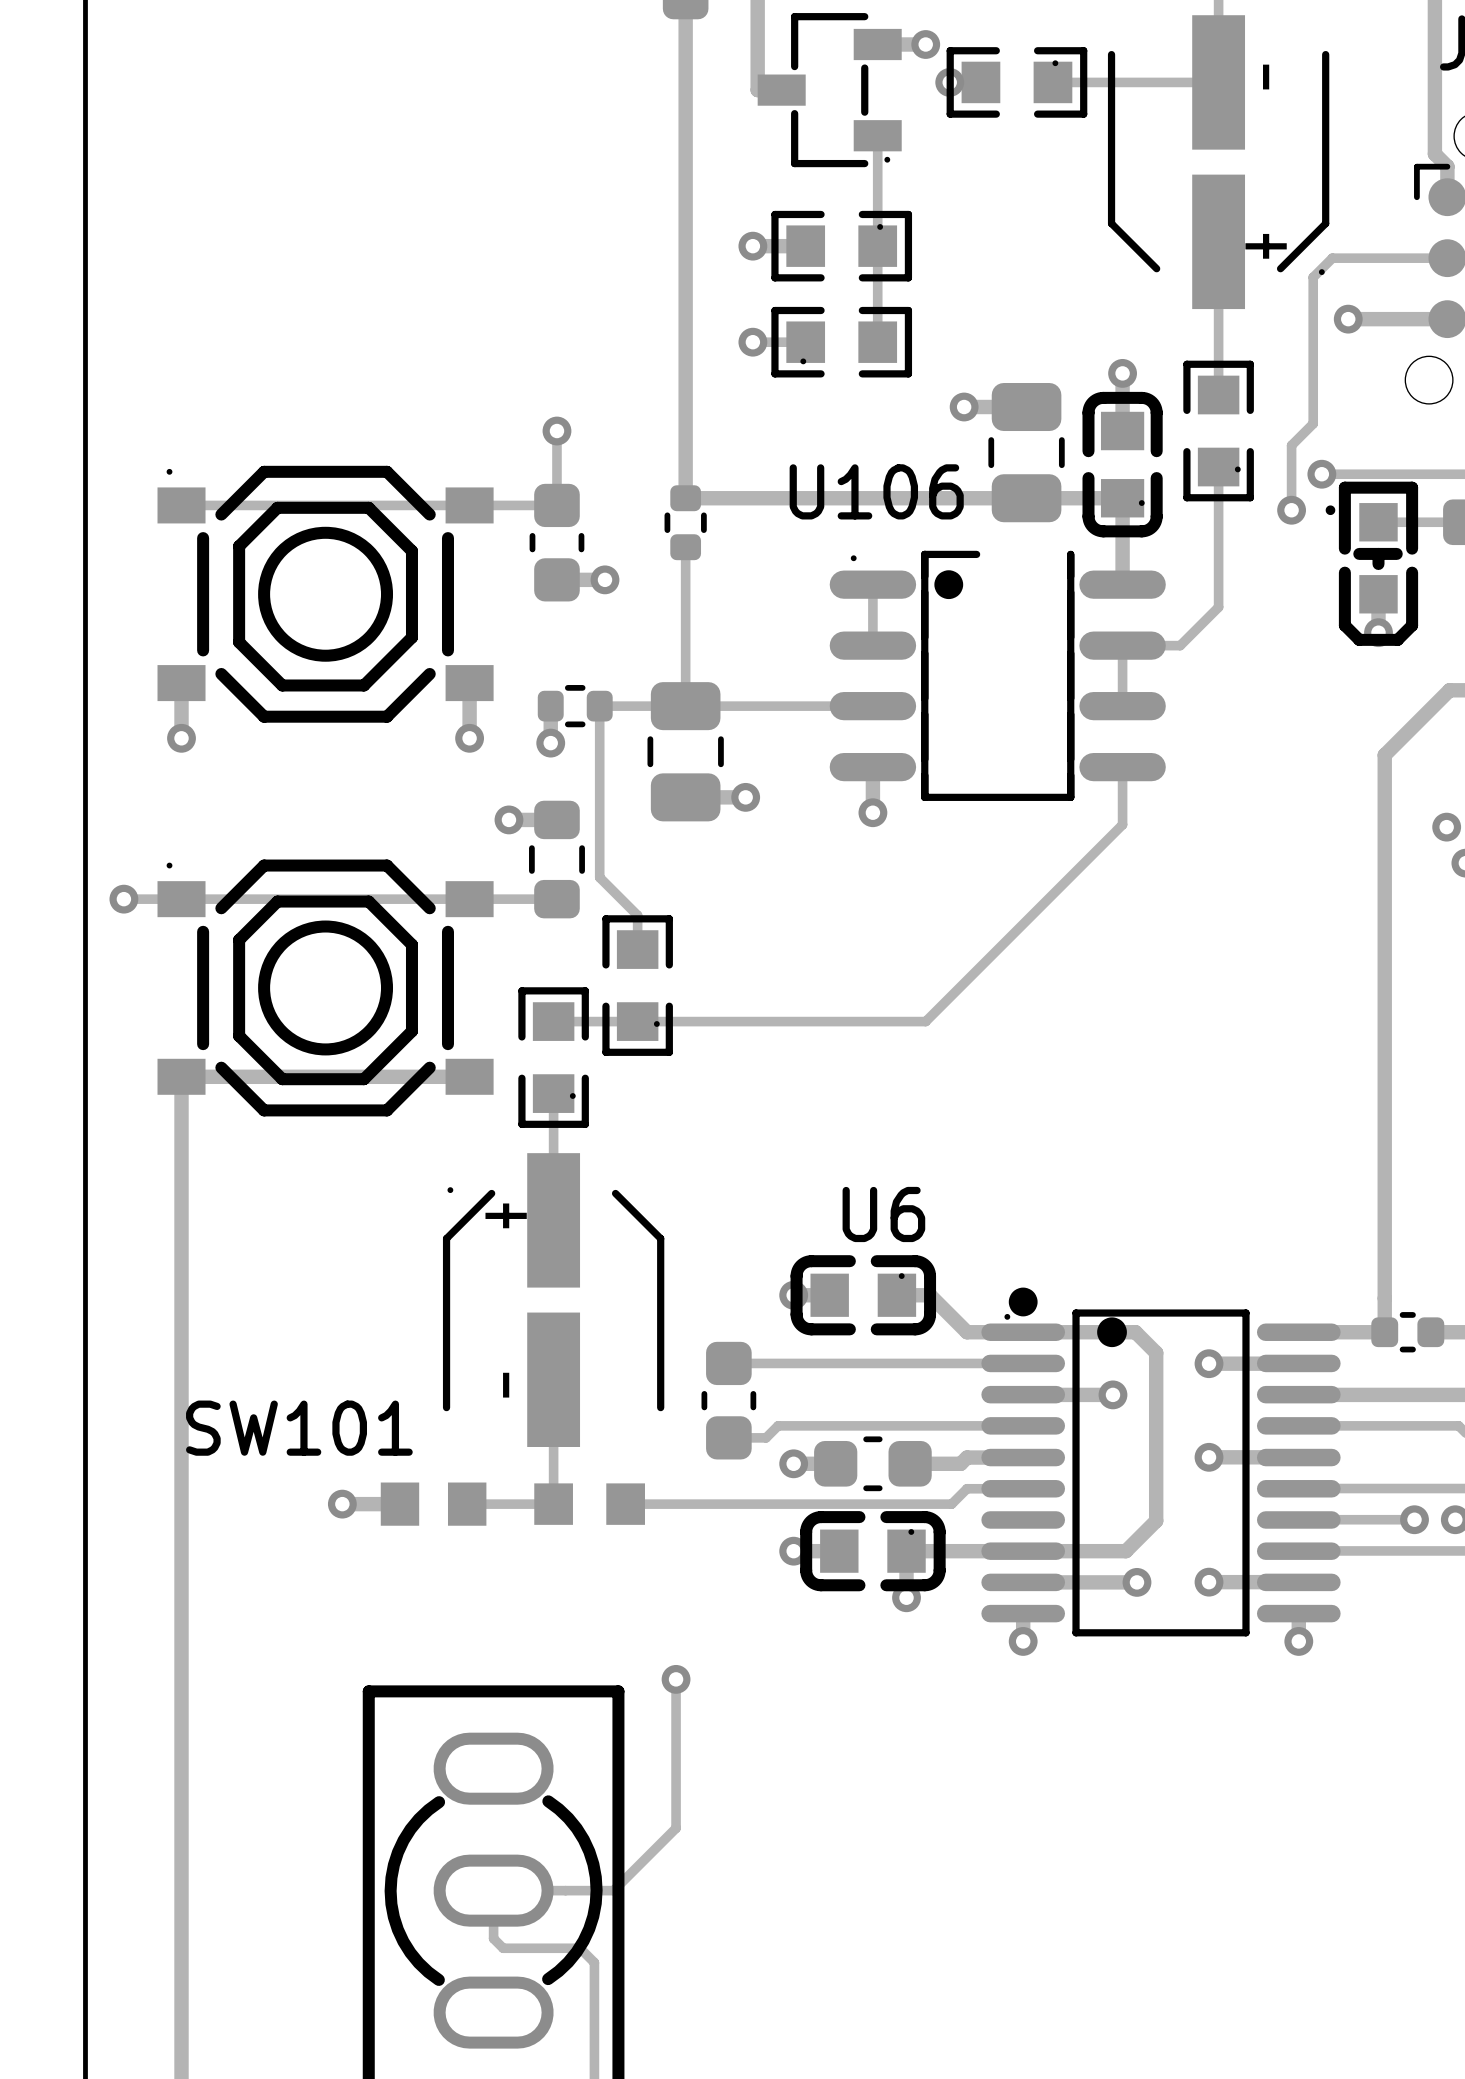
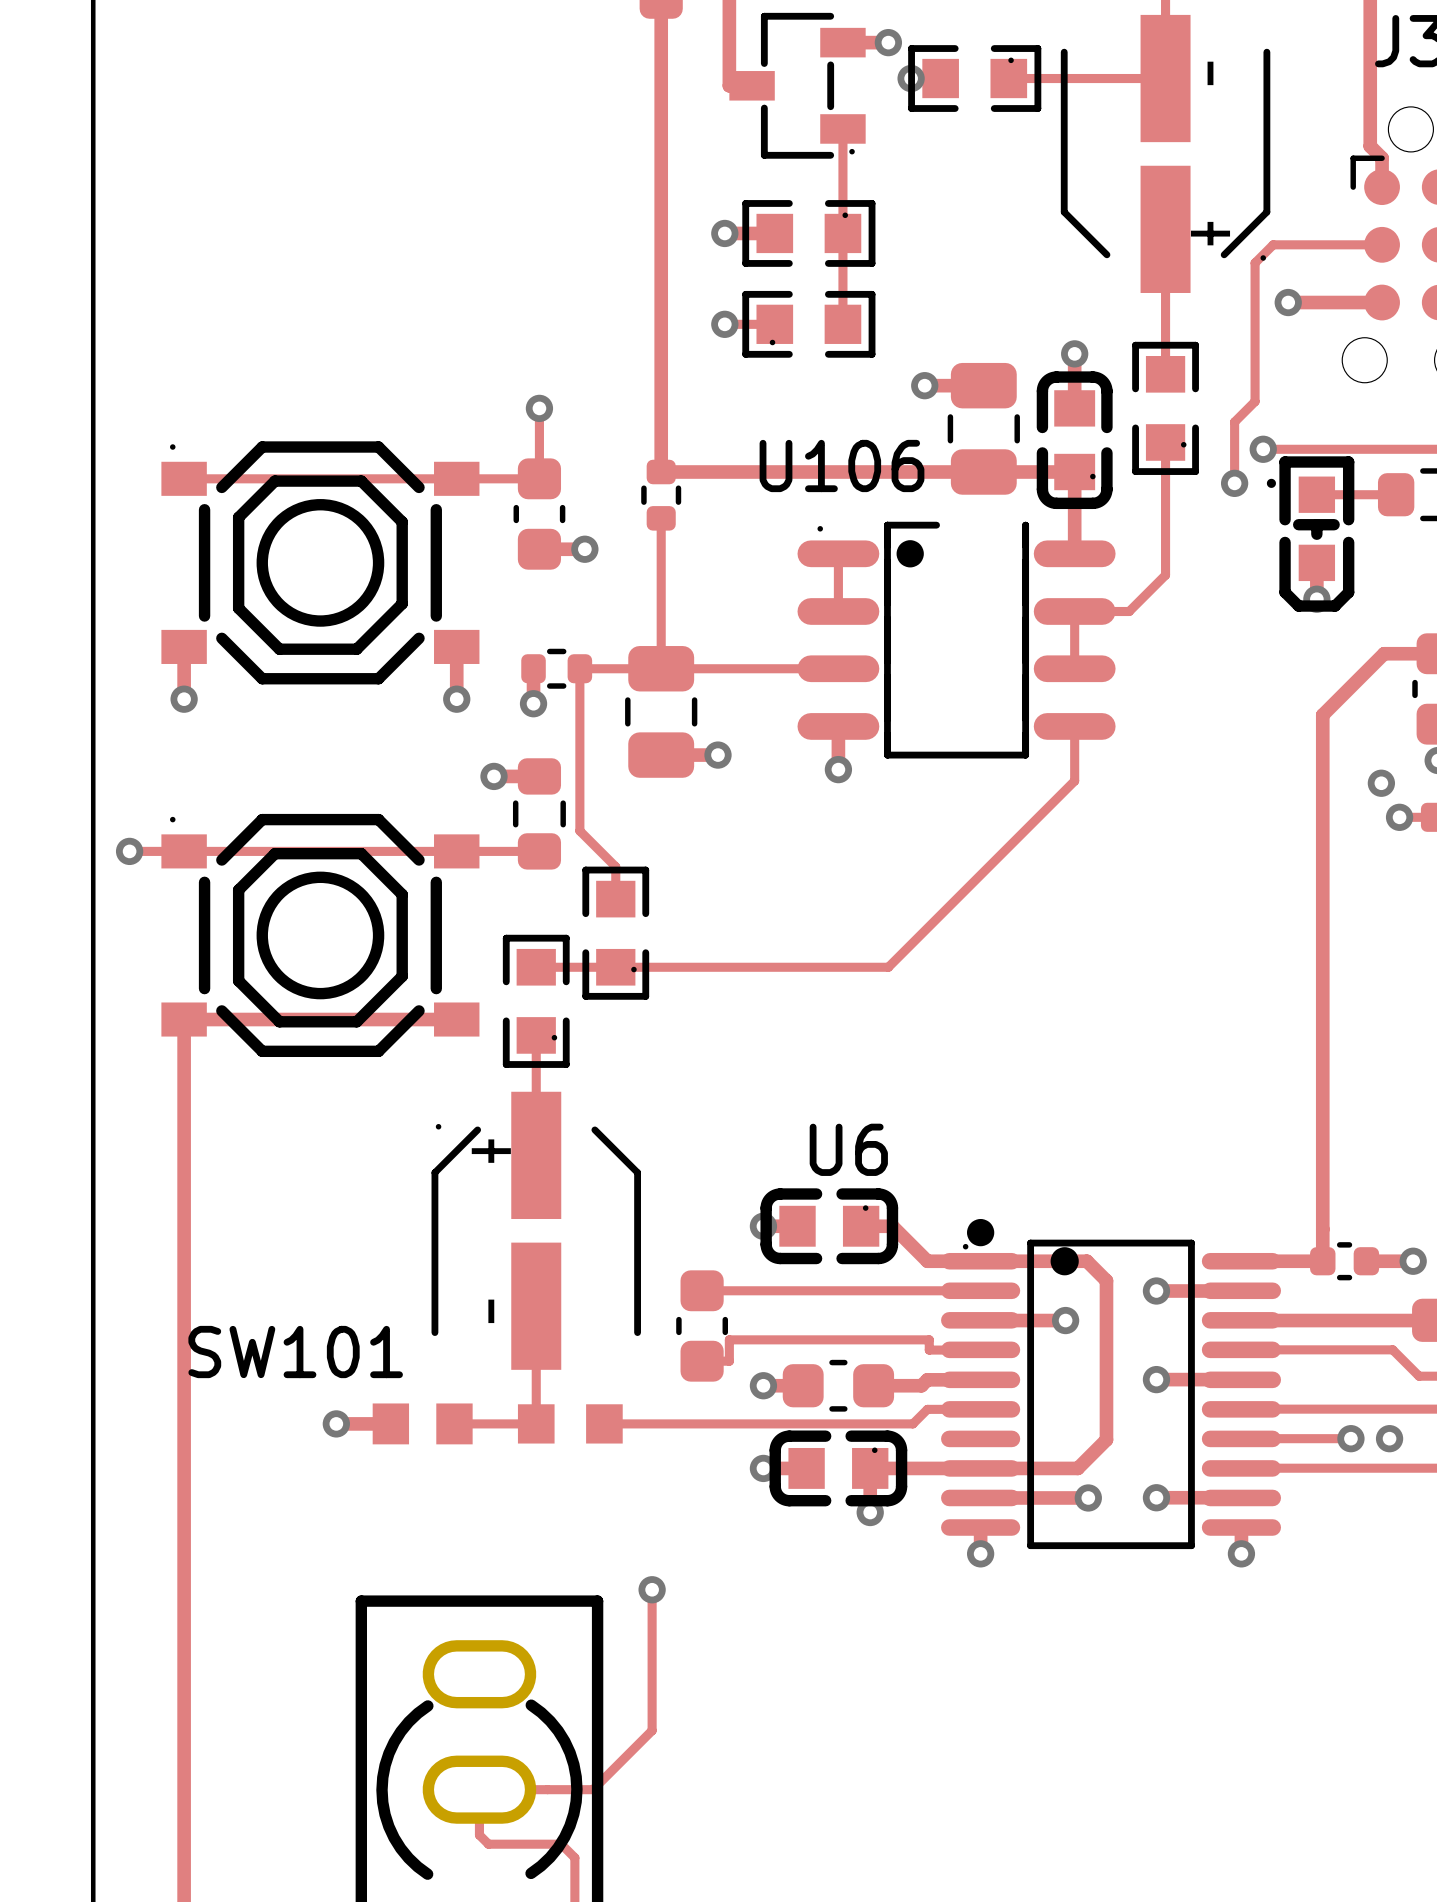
track: (1023, 1425) (778, 1425) (766, 1437) (757, 1437) -> (980, 1350) (929, 1350) (929, 1339) (729, 1339) (729, 1361)

